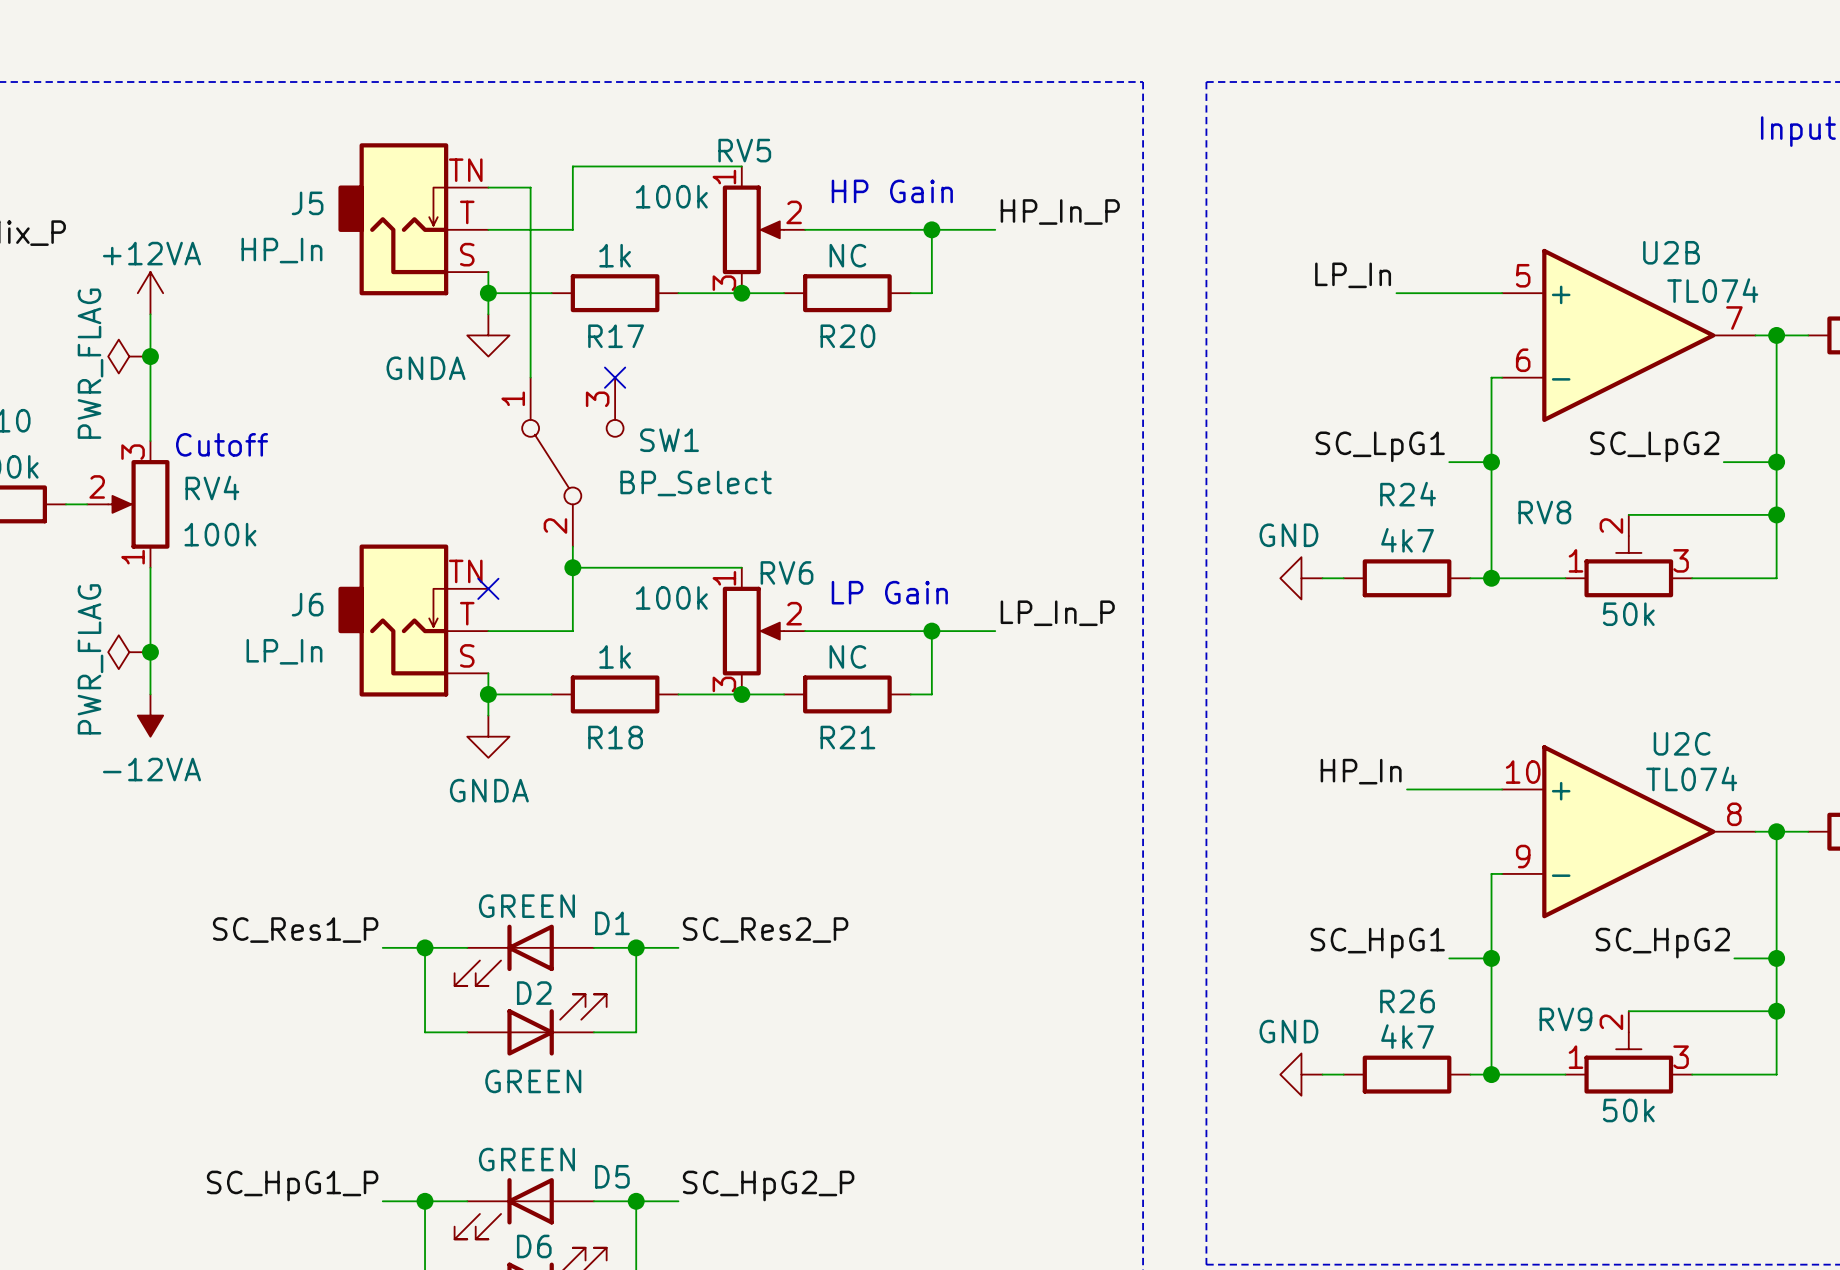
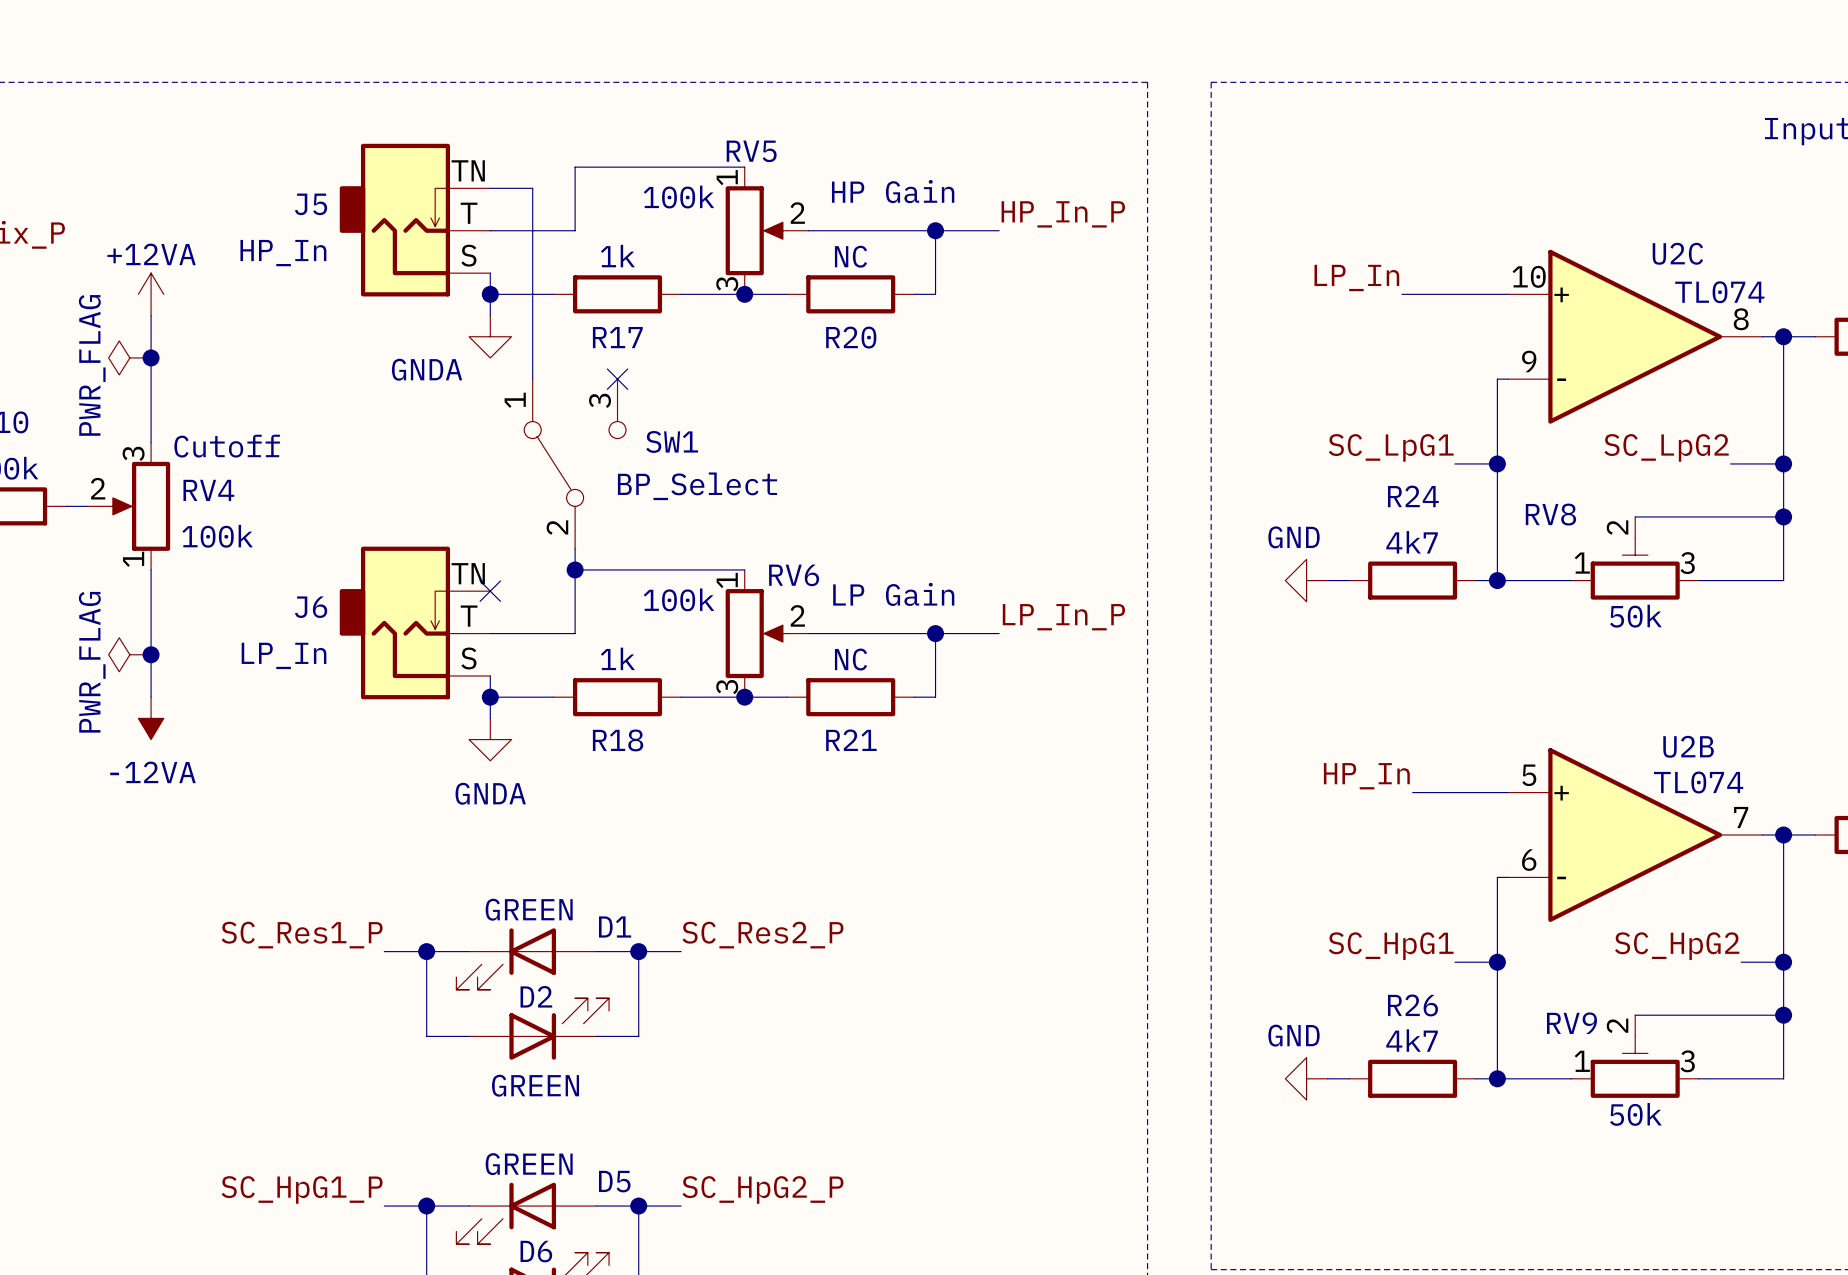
U2B name position: U2B (1671, 252) -> U2B (1688, 746)
U2B position: (1628, 335) -> (1635, 834)
U2C name position: U2C (1682, 743) -> U2C (1677, 253)
U2C position: (1628, 831) -> (1635, 336)

